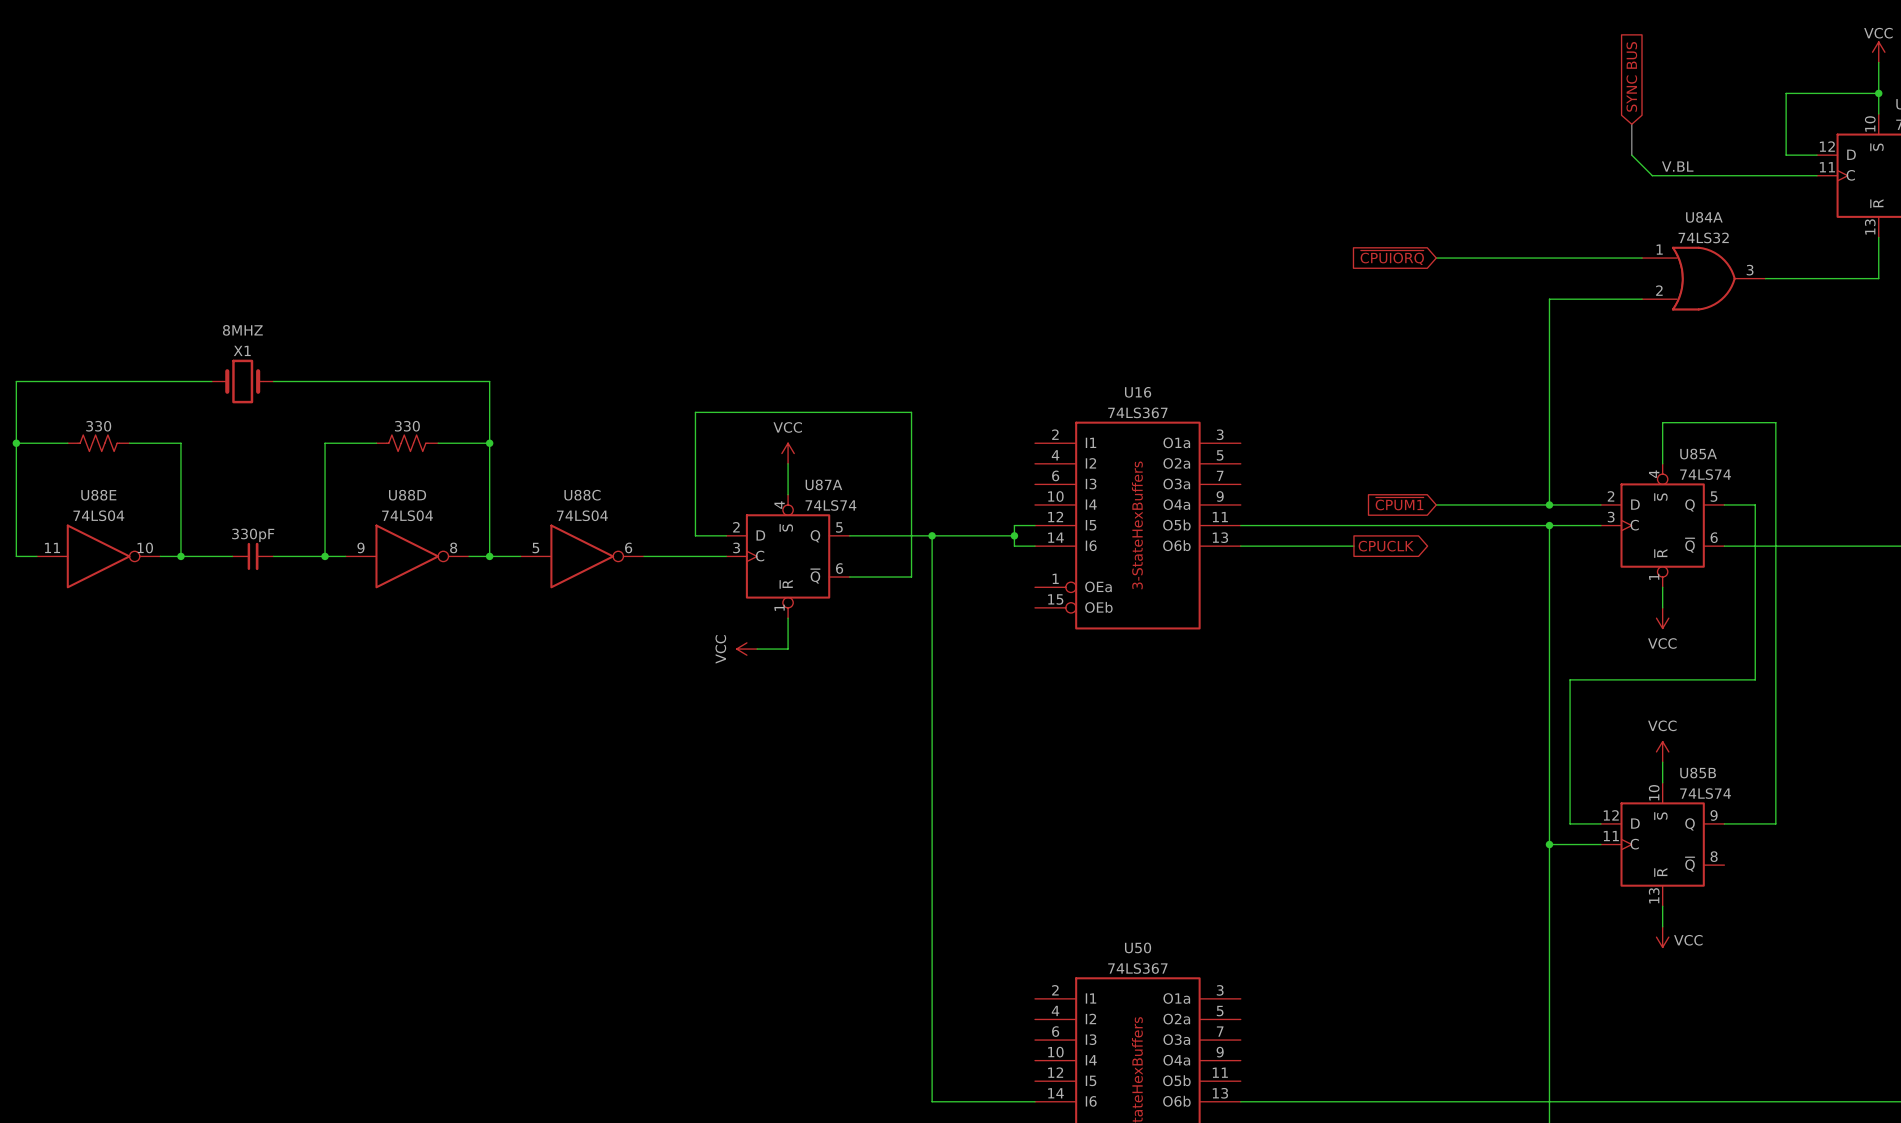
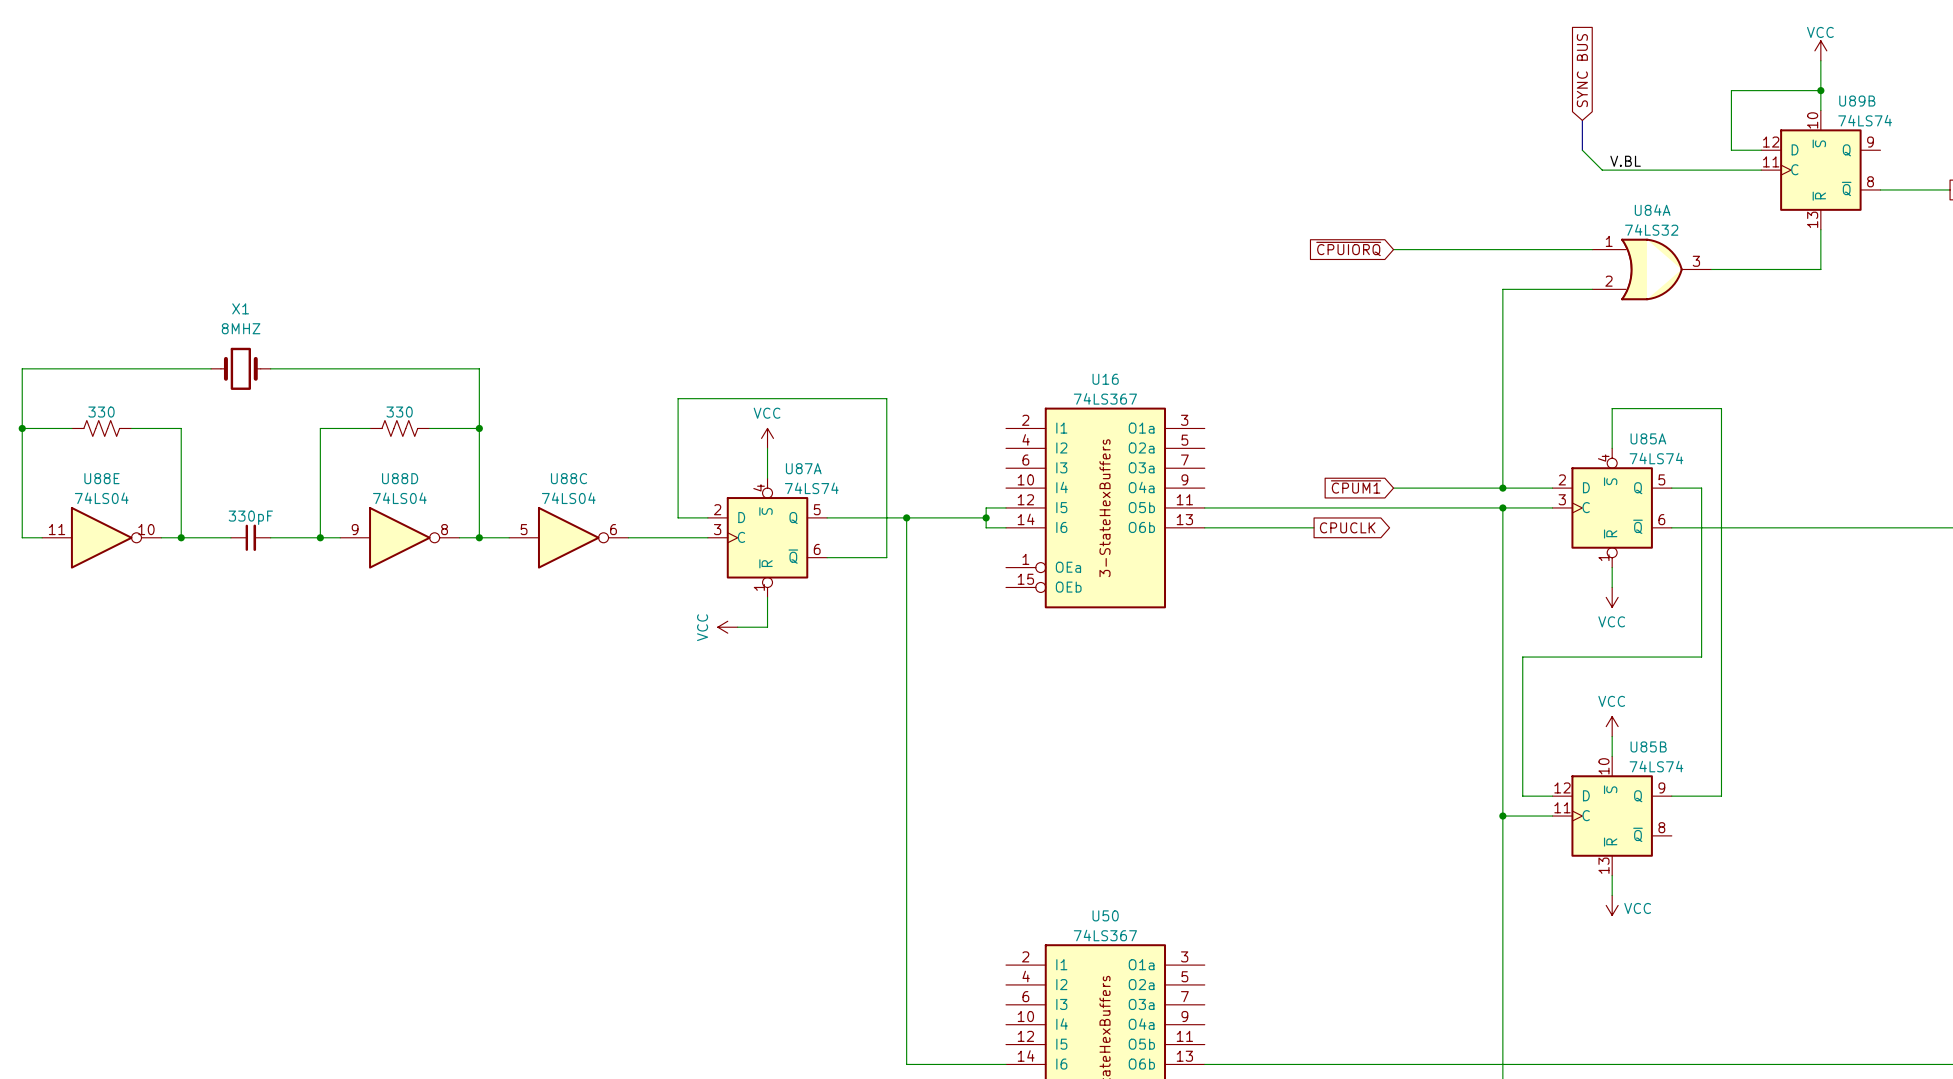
8MHZ name: 8MHZ (242, 330) -> X1 (240, 308)
8MHZ value: X1 (242, 350) -> 8MHZ (241, 328)

